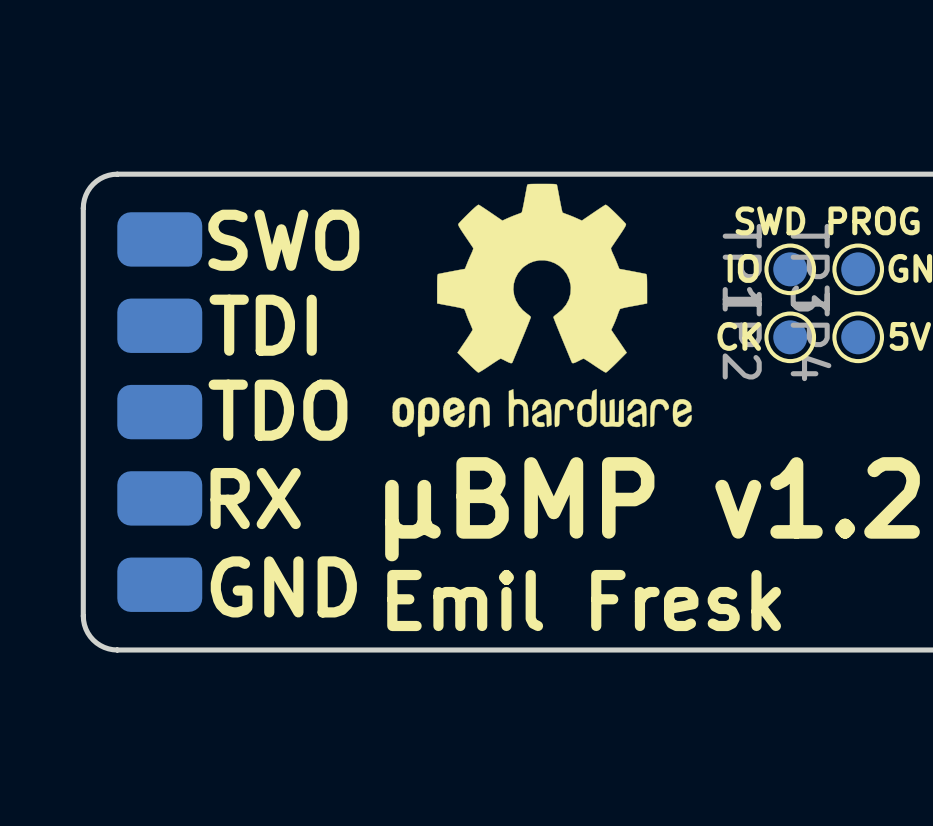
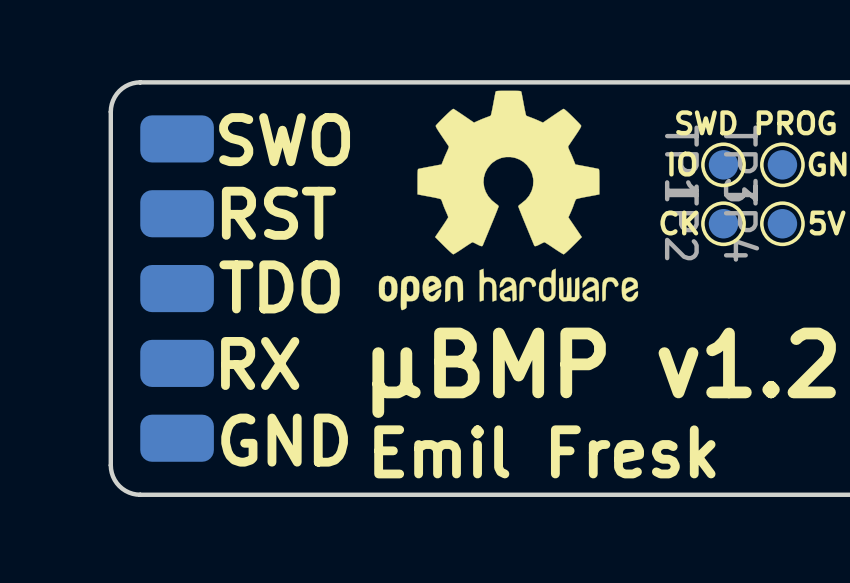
text: TDI (263, 325) -> RST (278, 213)

